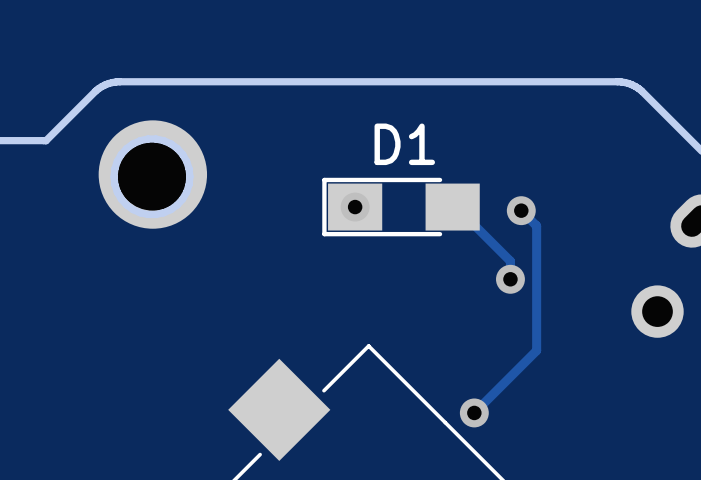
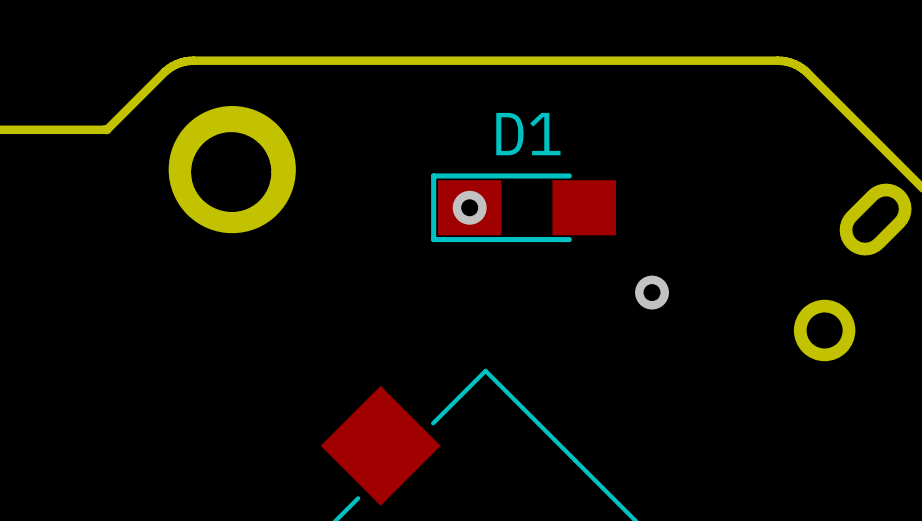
track: (452, 207) (456, 207) (510, 261) (510, 279) -> none
track: (521, 210) (536, 226) (536, 350) (474, 412) -> none
via: (521, 210) -> none
via: (474, 412) -> none

